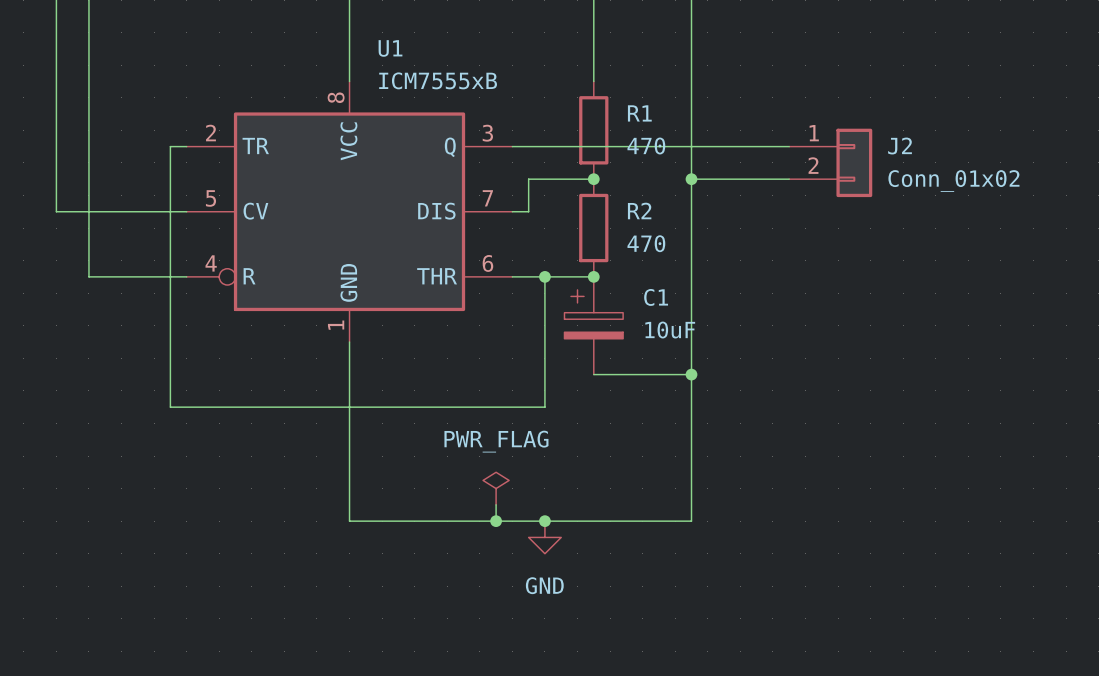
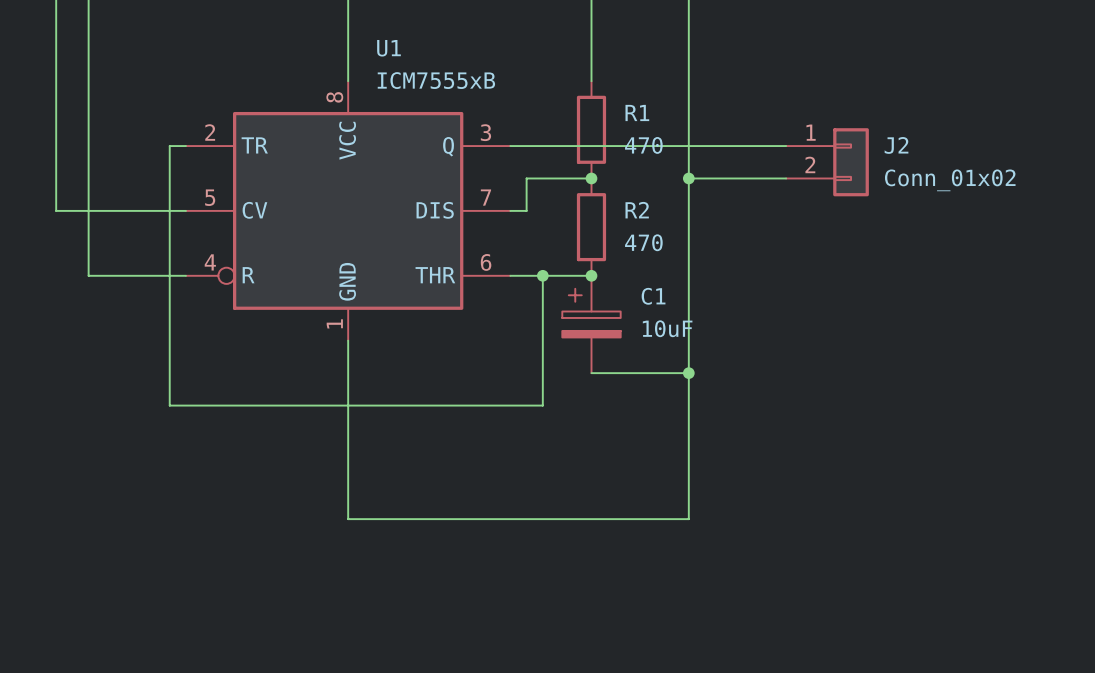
power symbol: PWR_FLAG (496, 488) -> none
wire: (496, 504) (496, 521) -> none
junction: (496, 521) -> none
junction: (544, 521) -> none
power symbol: GND (544, 537) -> none

